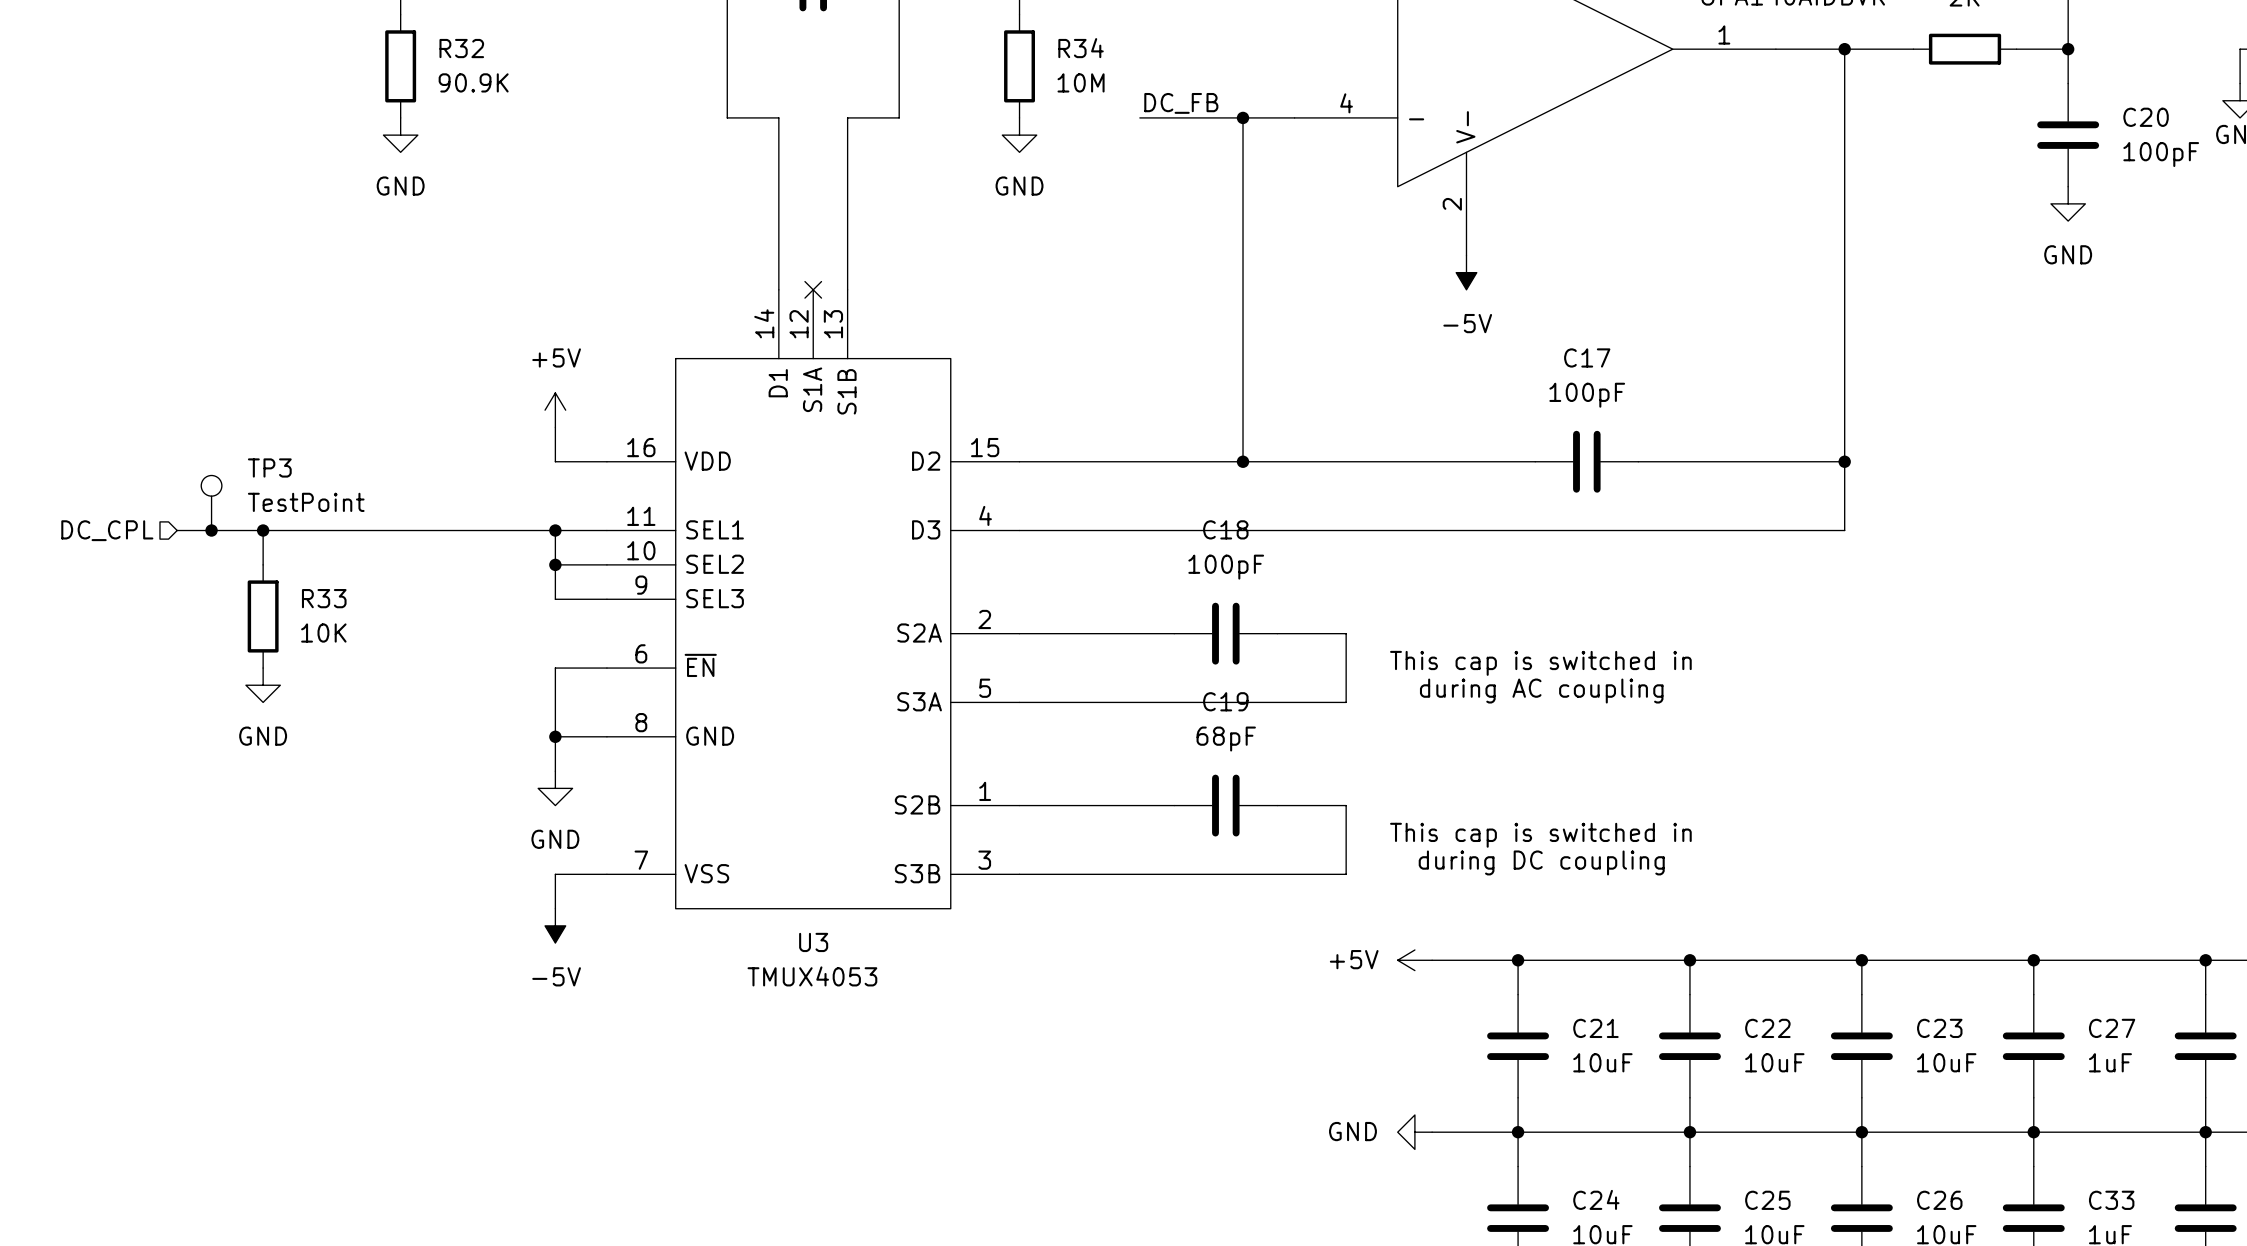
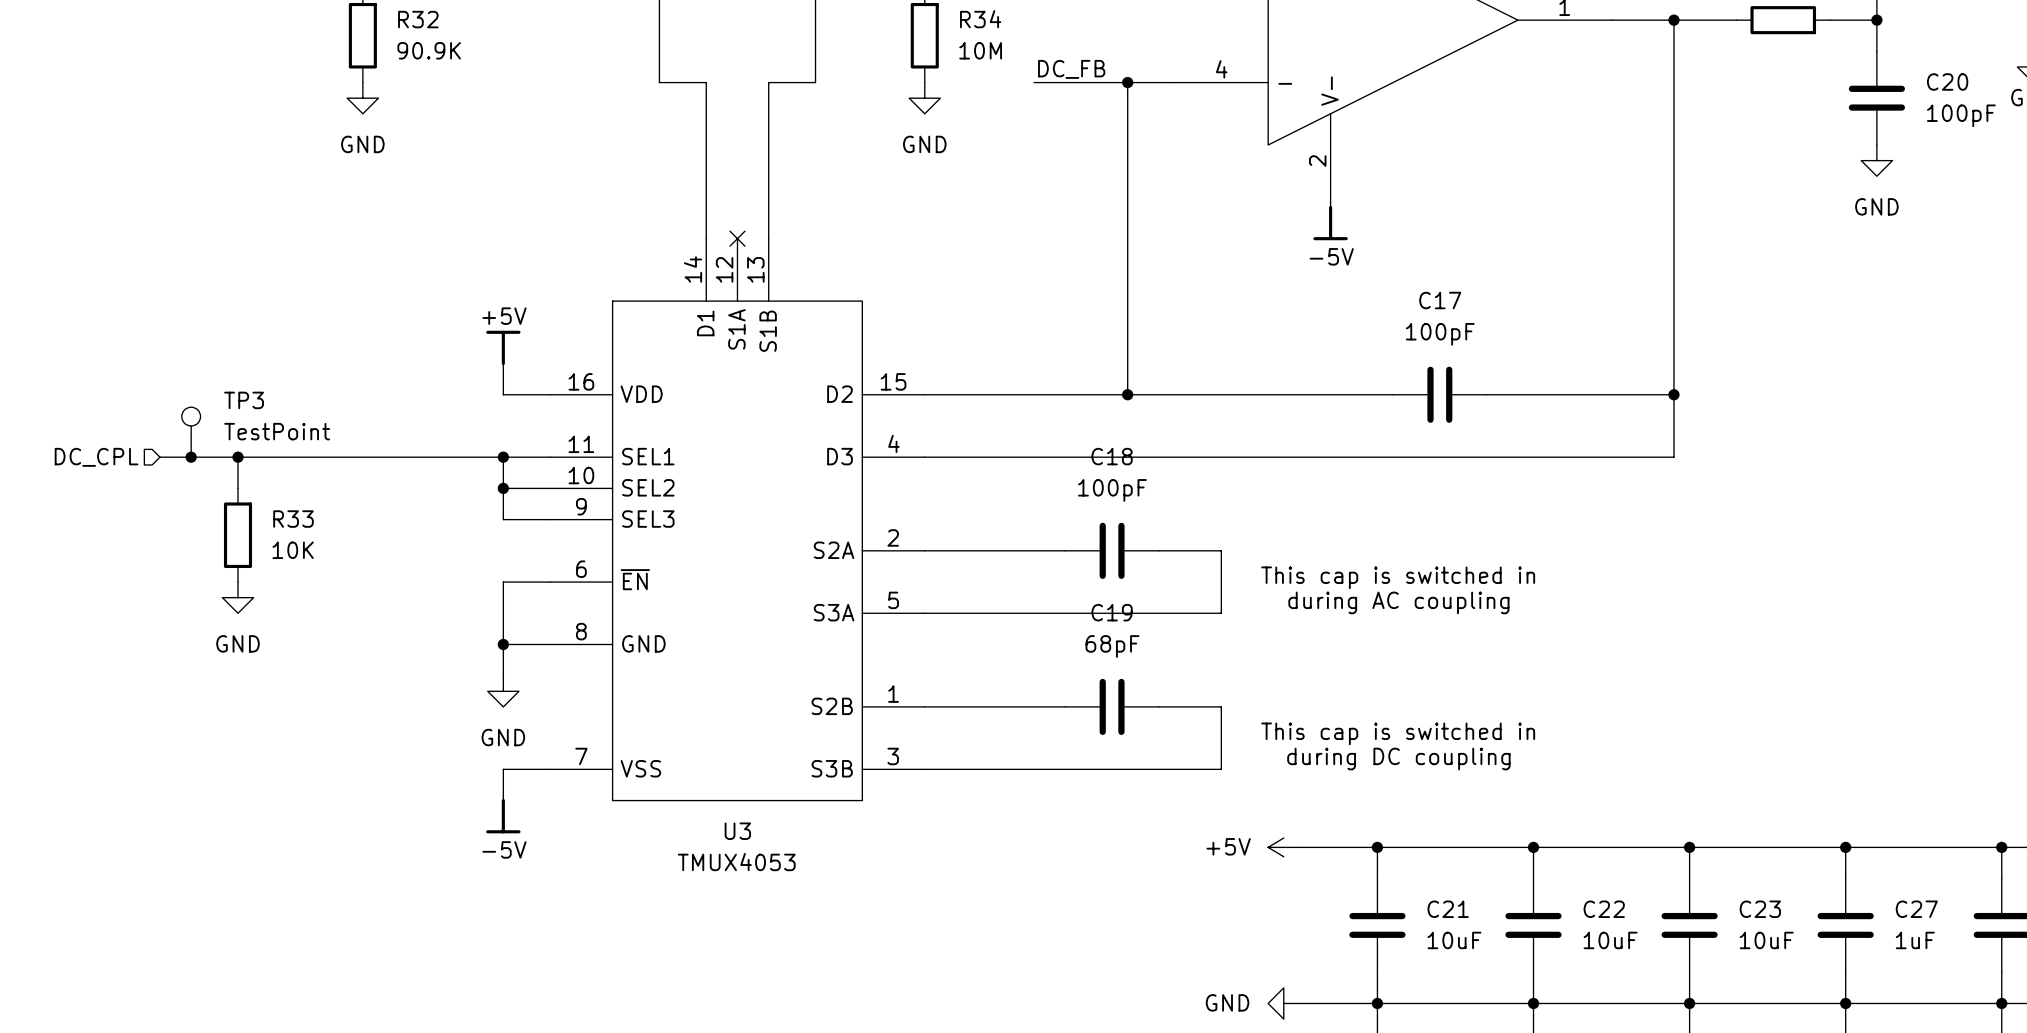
power symbol shape: [1456, 255, 1477, 290] -> [1313, 205, 1348, 241]
power symbol shape: [545, 392, 566, 428] -> [486, 330, 521, 366]
power symbol shape: [545, 908, 566, 944] -> [486, 799, 521, 834]

